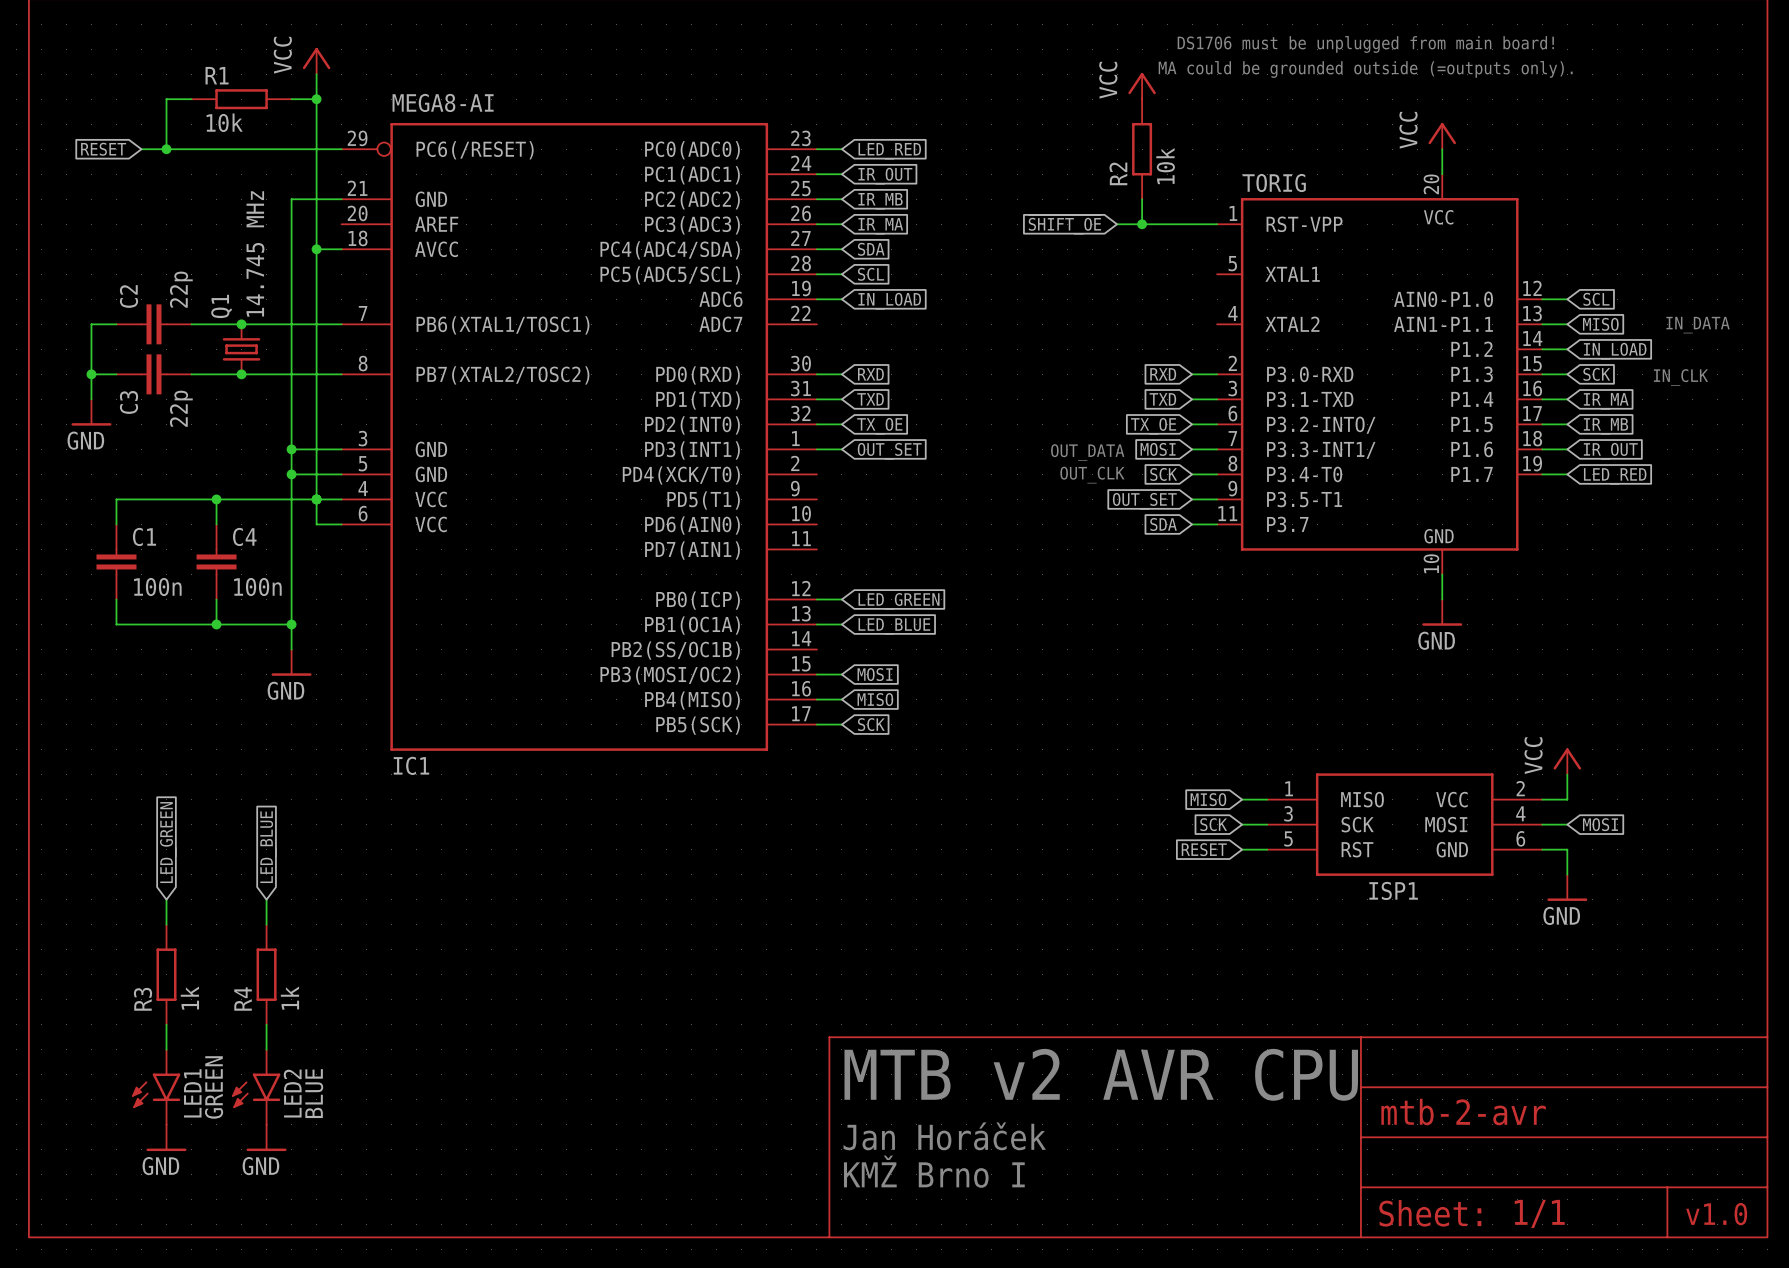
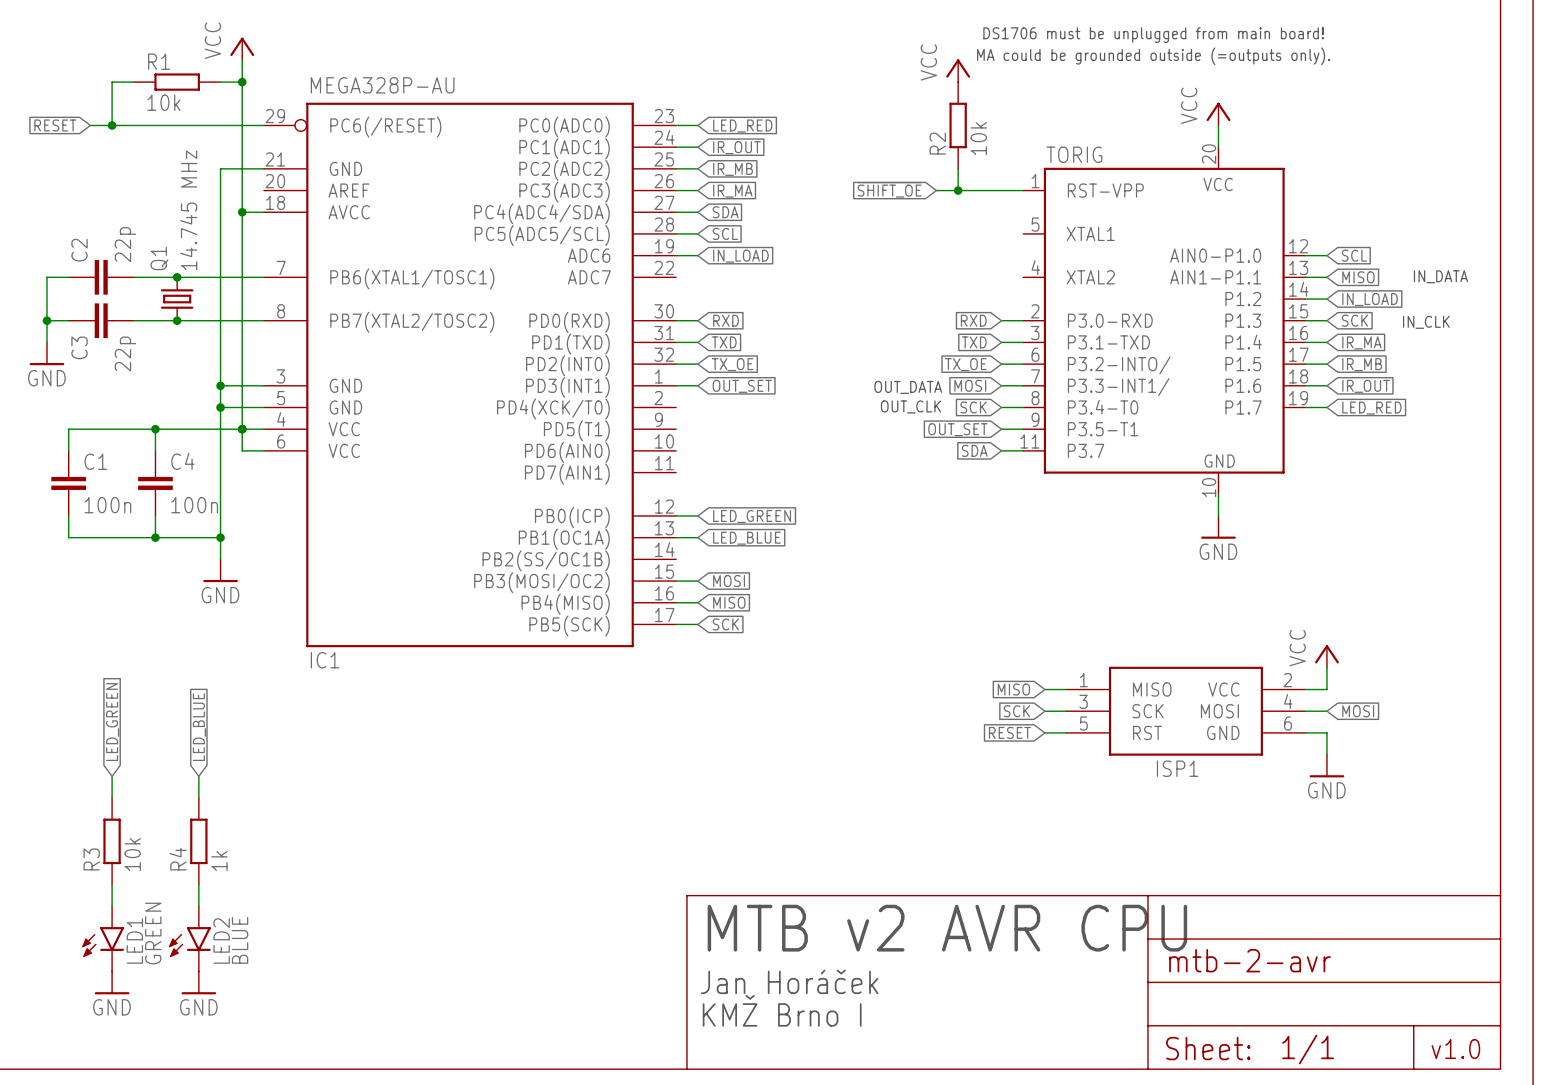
IC1 value: MEGA8-AI (443, 102) -> MEGA328P-AU (382, 85)
R3 value: 1k (189, 998) -> 10k (132, 854)

